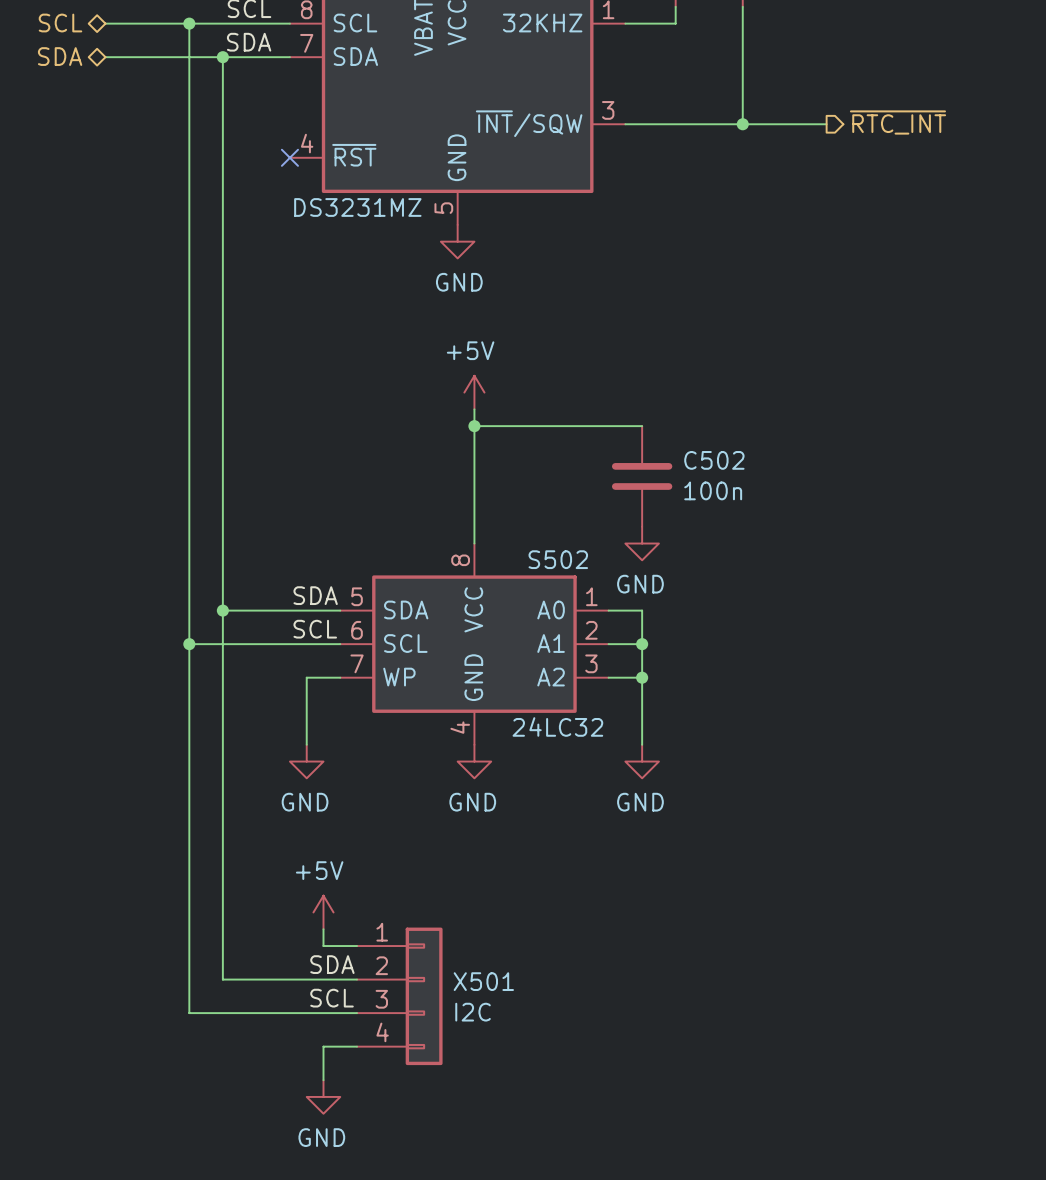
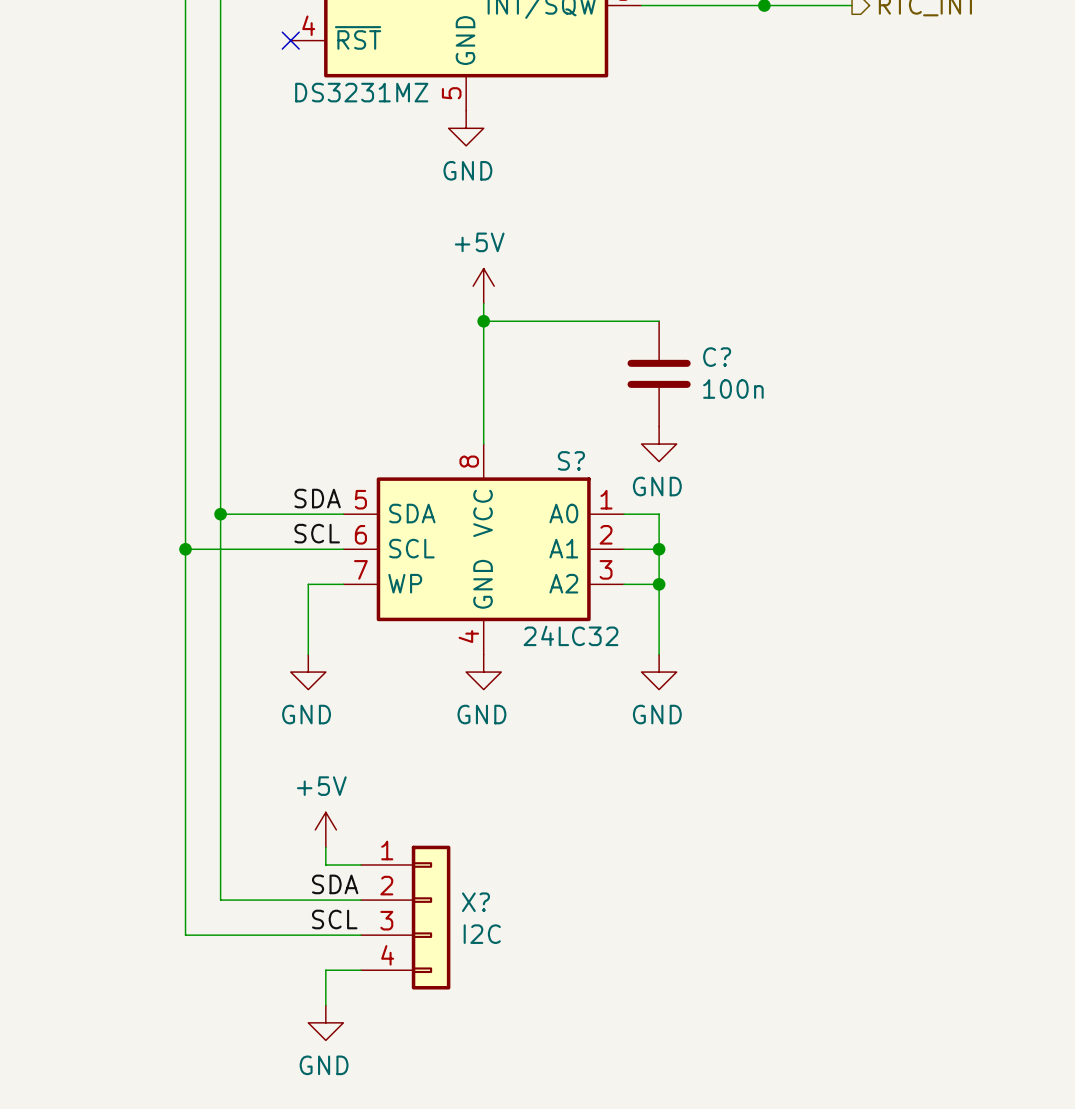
C502 name: C502 (714, 460) -> C? (717, 357)
S502 name: S502 (558, 559) -> S? (571, 460)
X501 name: X501 (483, 981) -> X? (475, 902)

